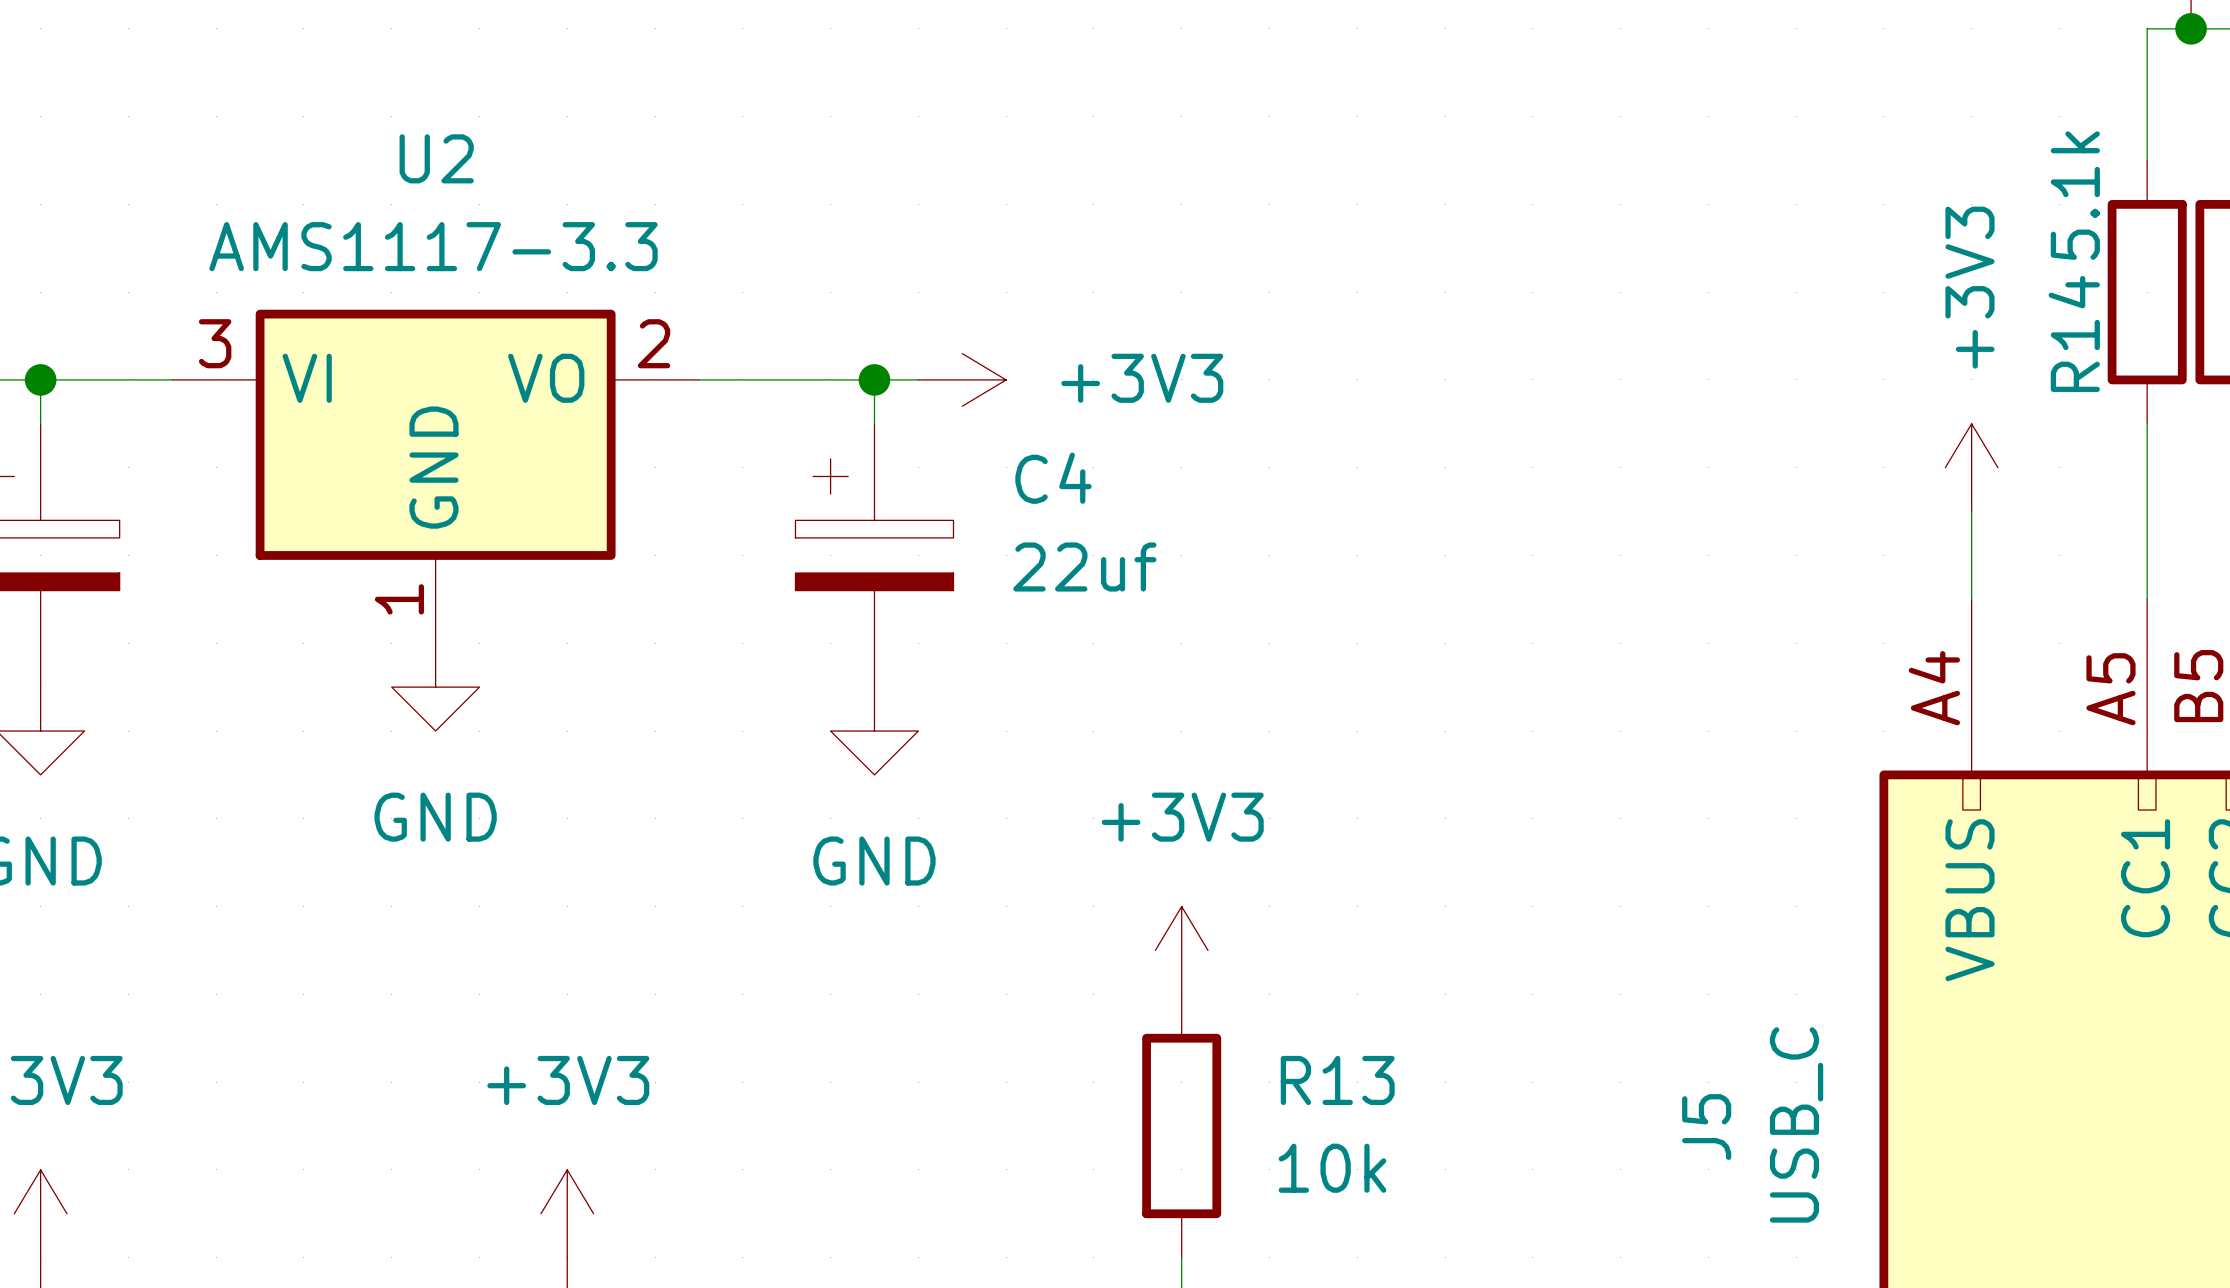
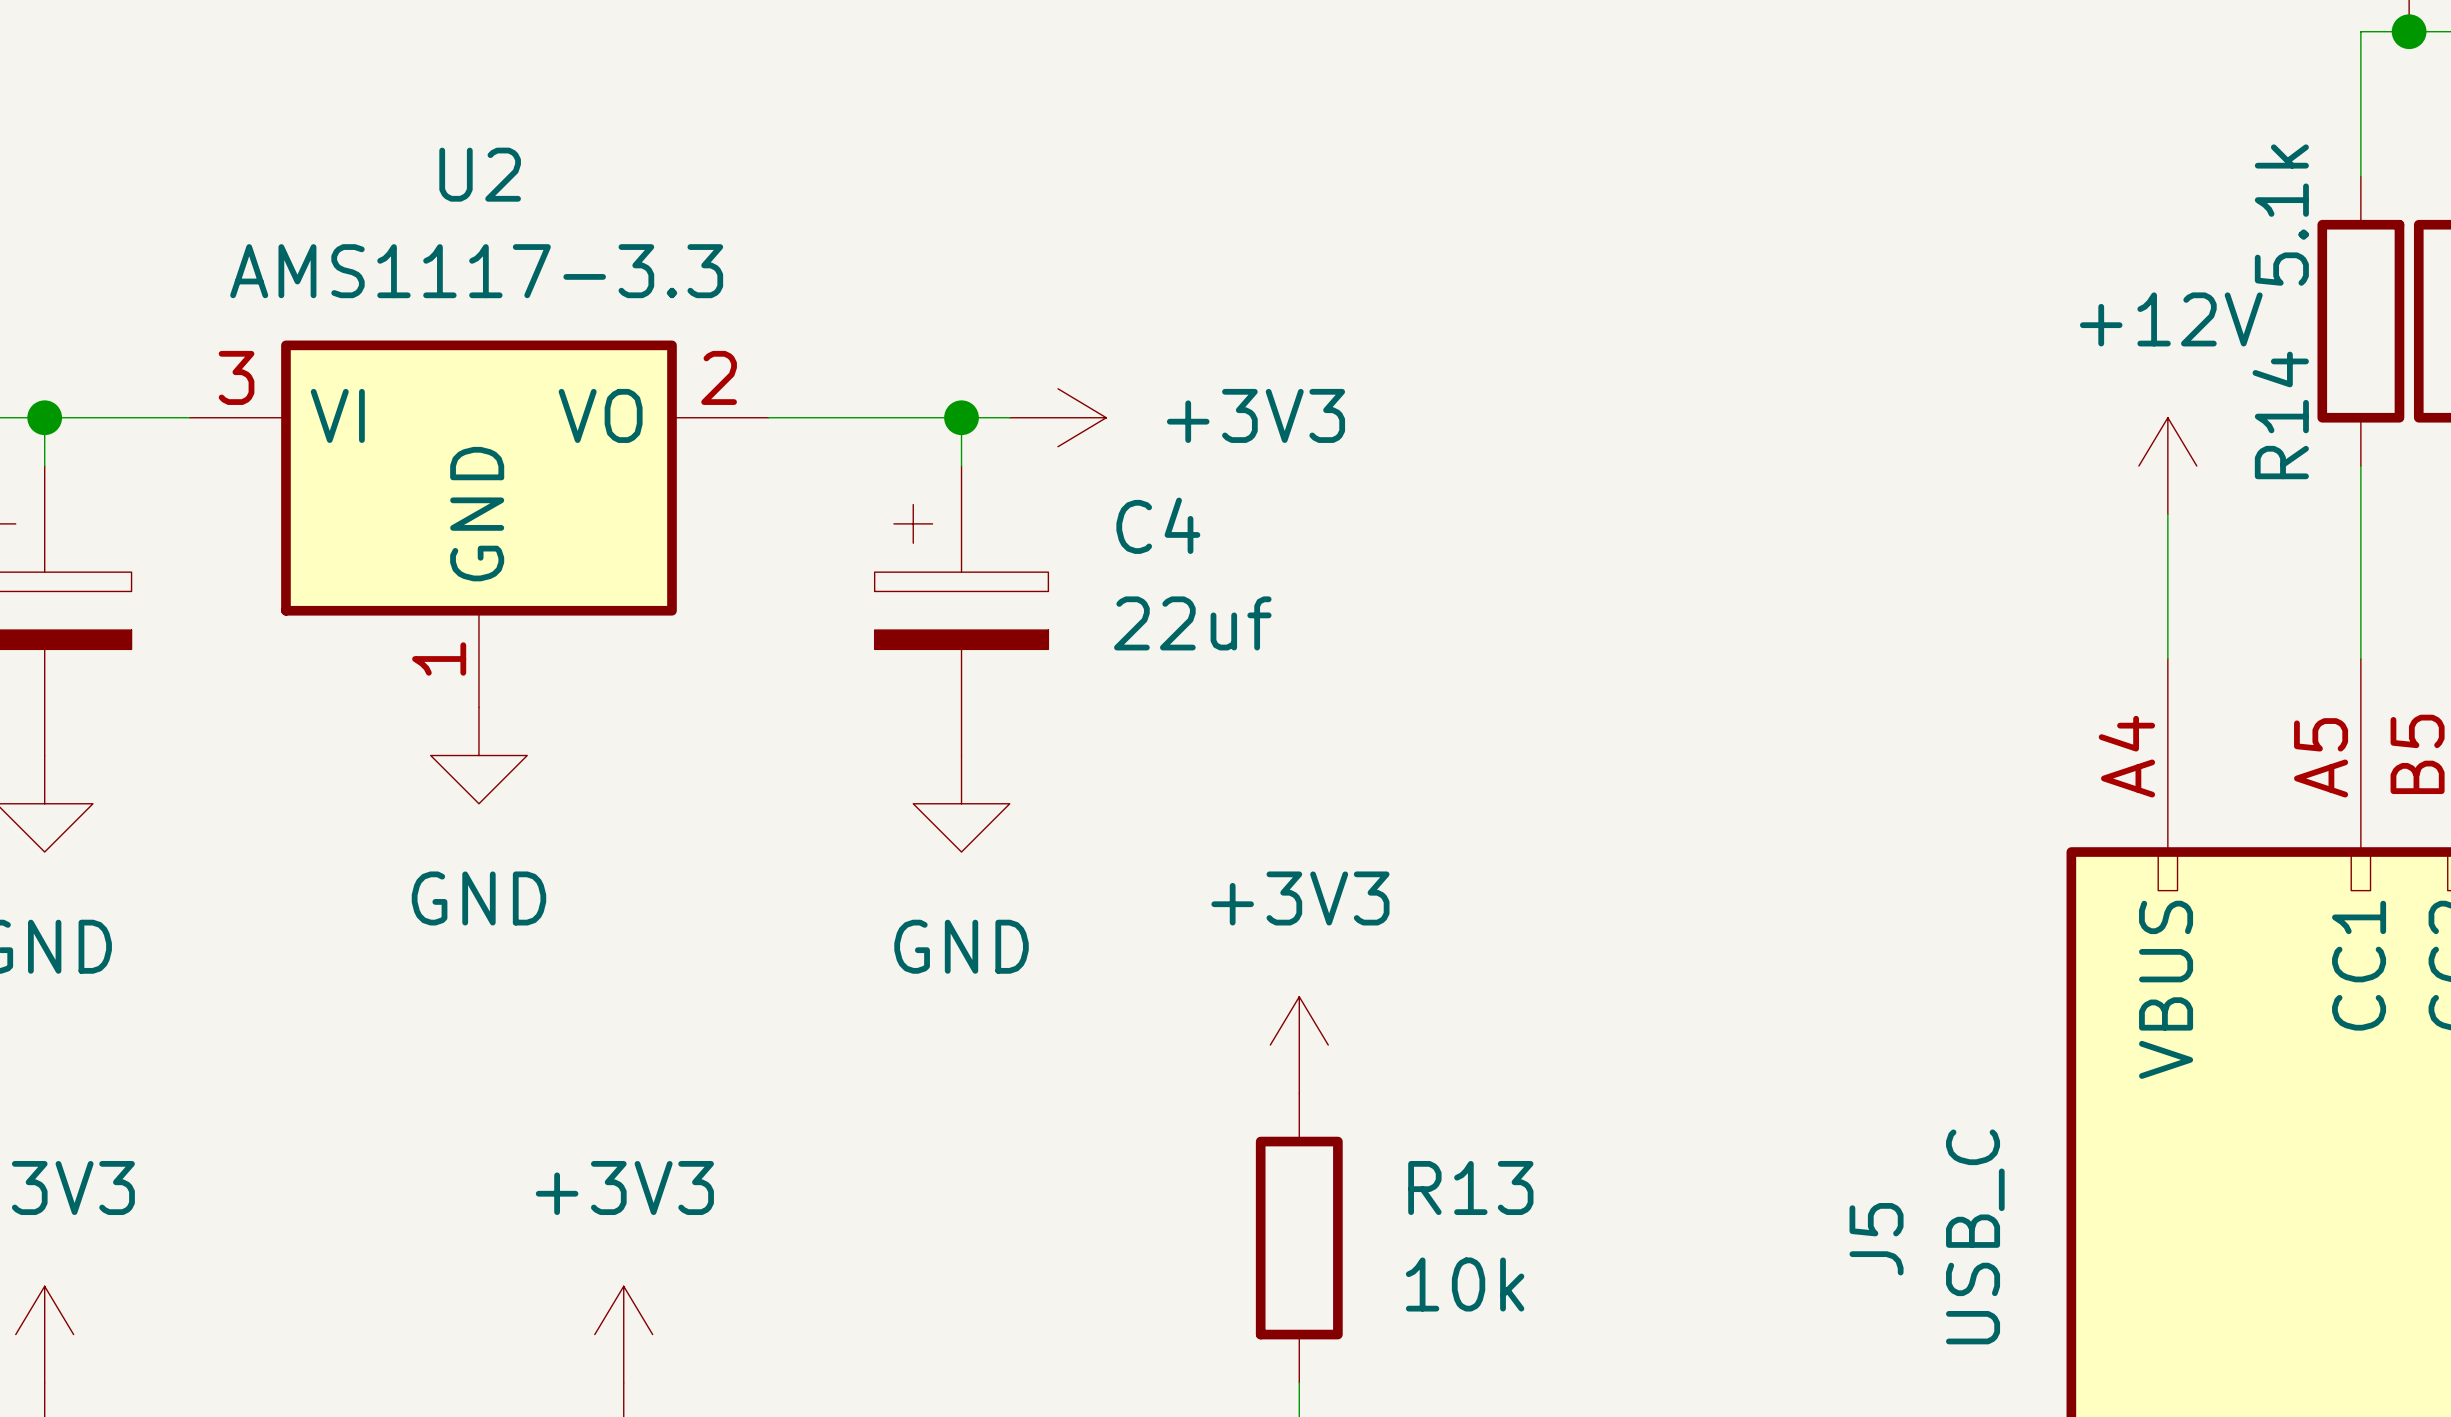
R14 name position: R14 (2074, 333) -> R14 (2280, 415)
power symbol: none -> +12V (2167, 465)
power symbol: +3V3 (1971, 467) -> none

